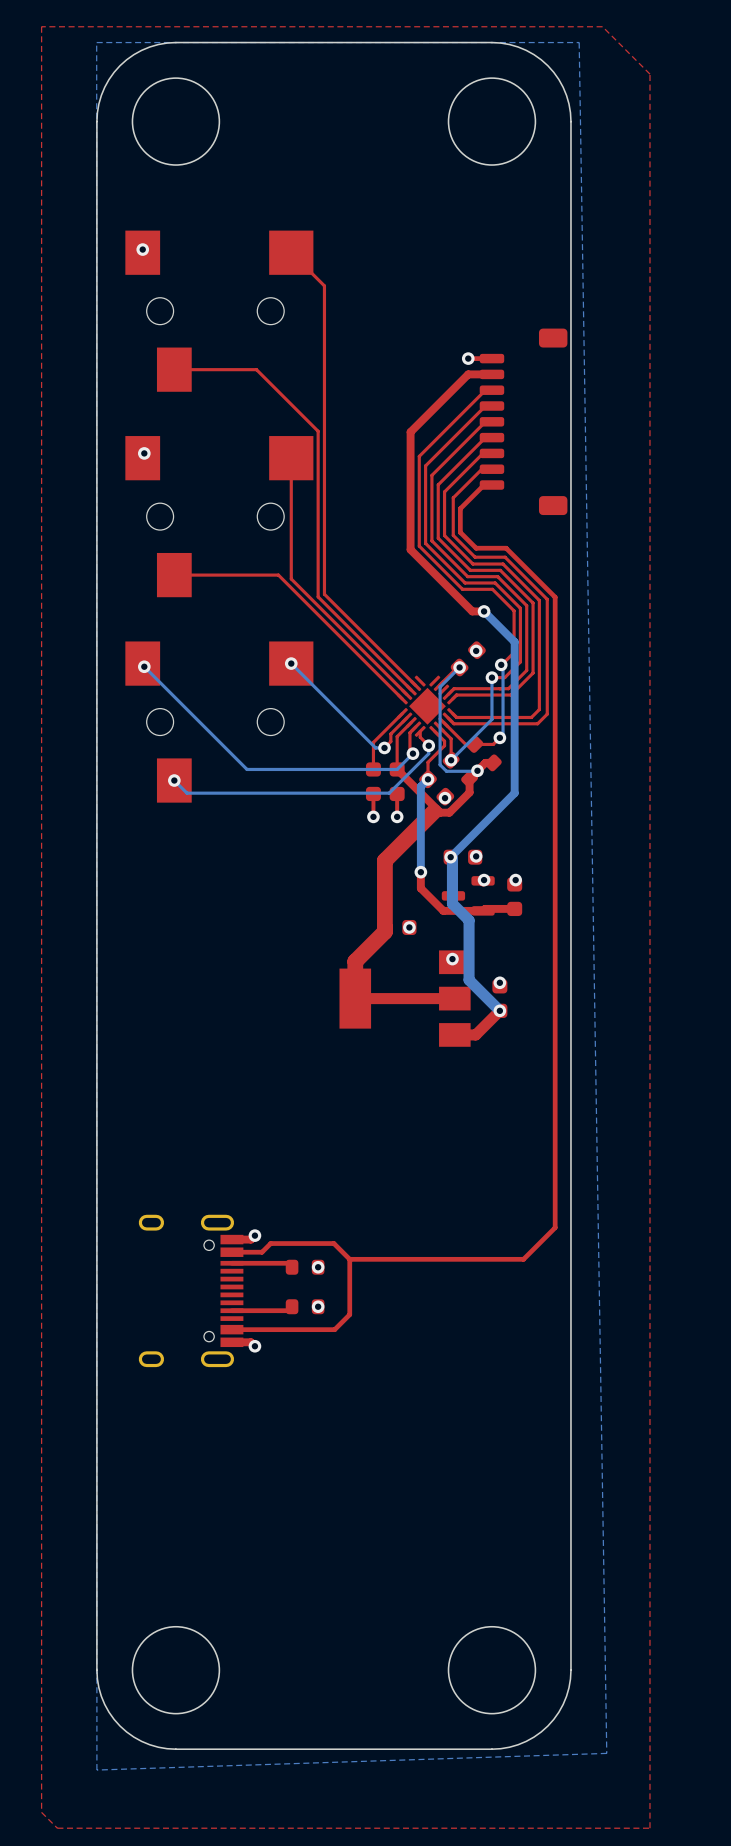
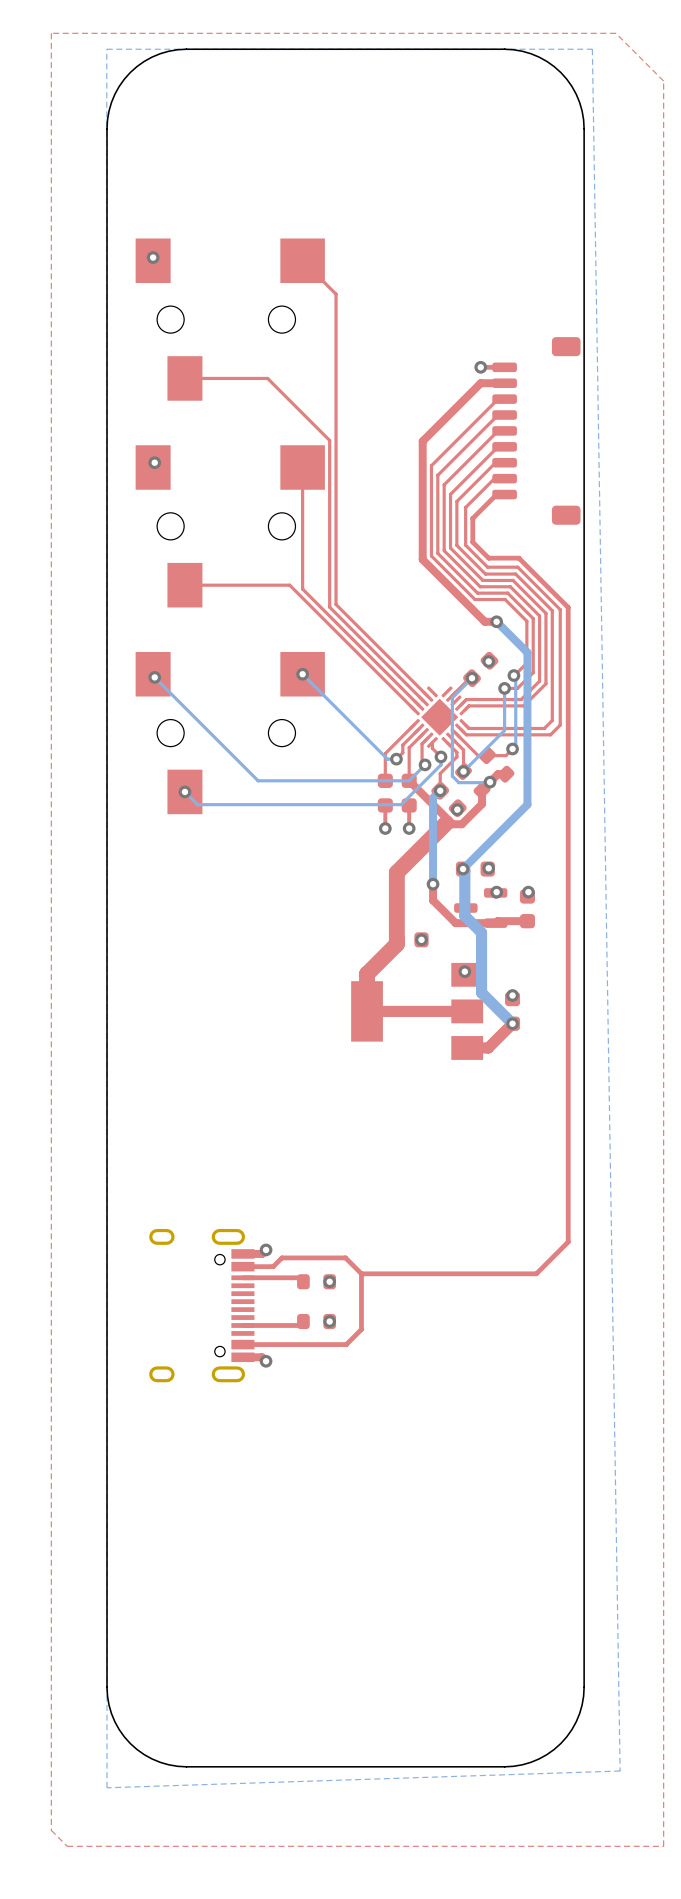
round board edge: [131, 77, 221, 166] -> none
round board edge: [447, 77, 537, 166] -> none
round board edge: [131, 1625, 221, 1715] -> none
round board edge: [447, 1625, 537, 1715] -> none

